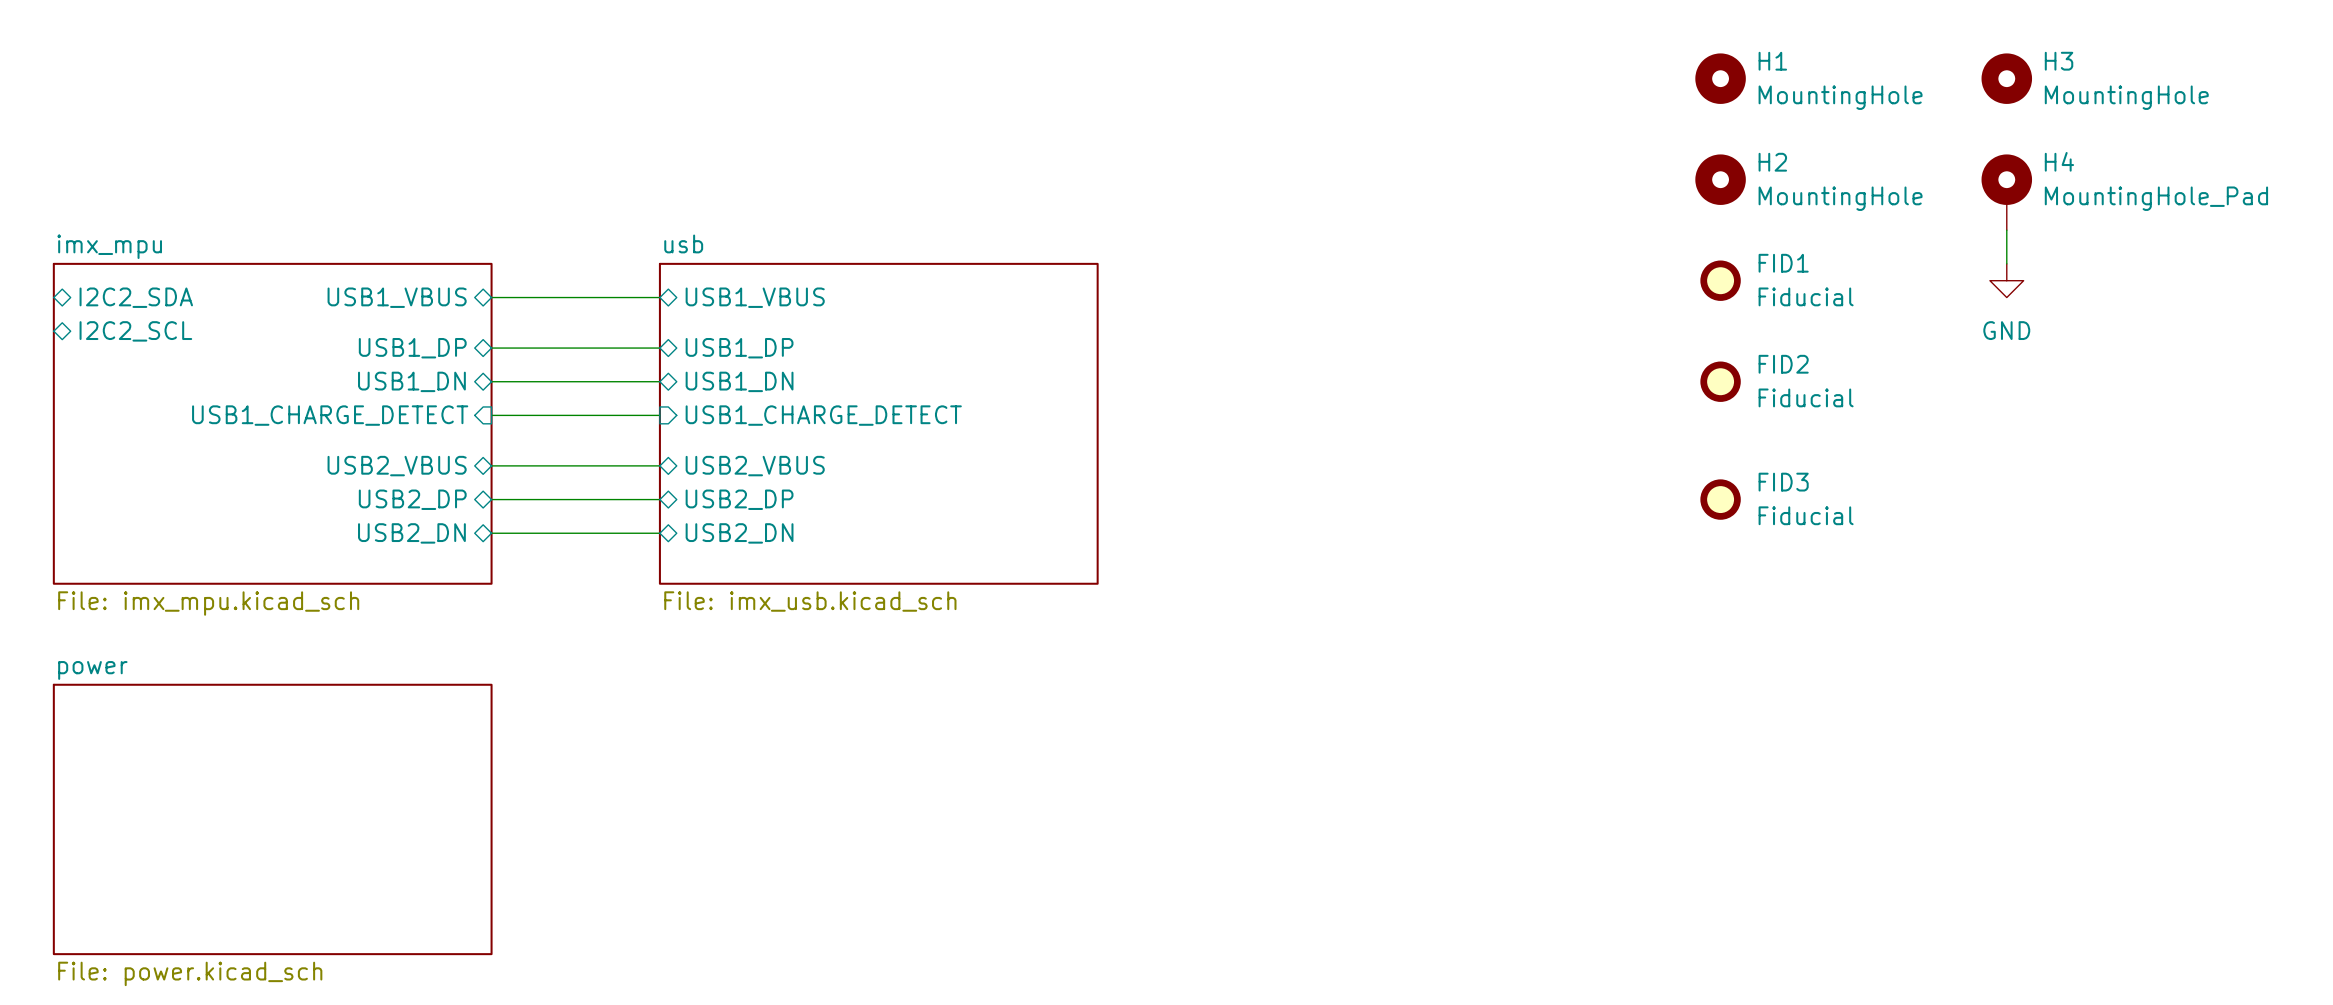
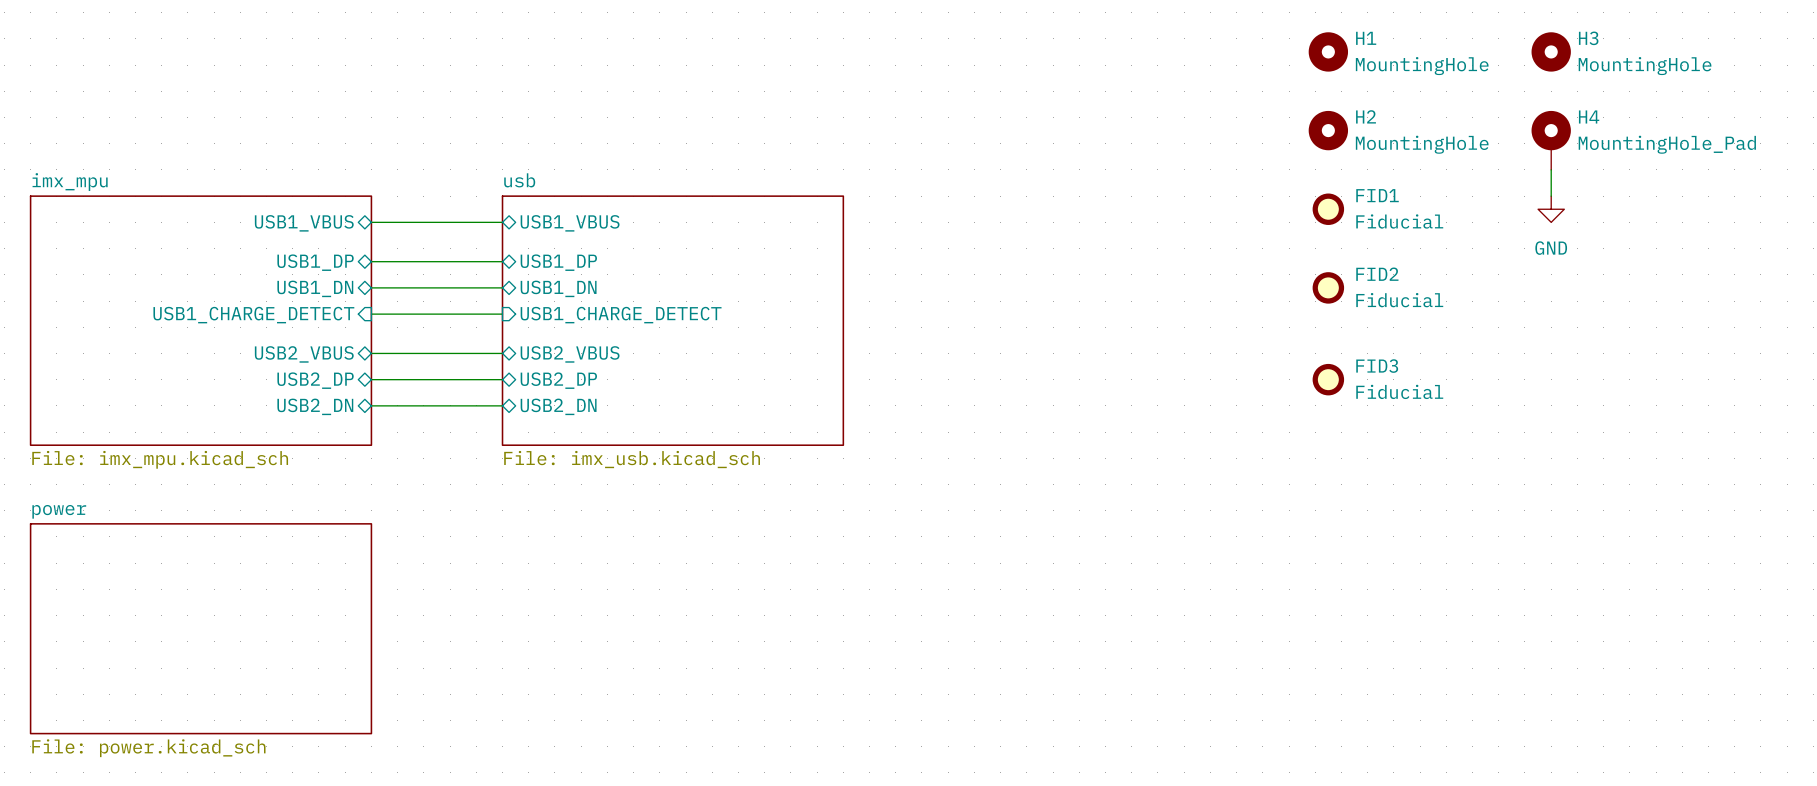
sheet pin: I2C2_SDA (136, 297) -> none
sheet pin: I2C2_SCL (135, 331) -> none

